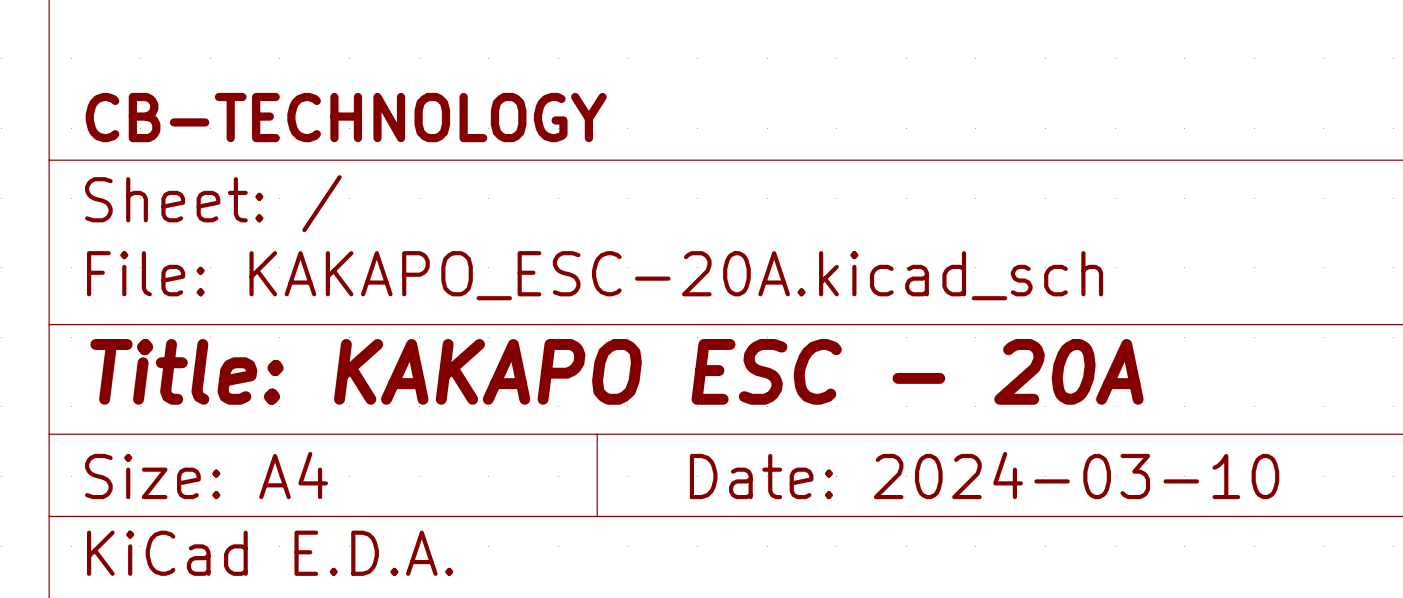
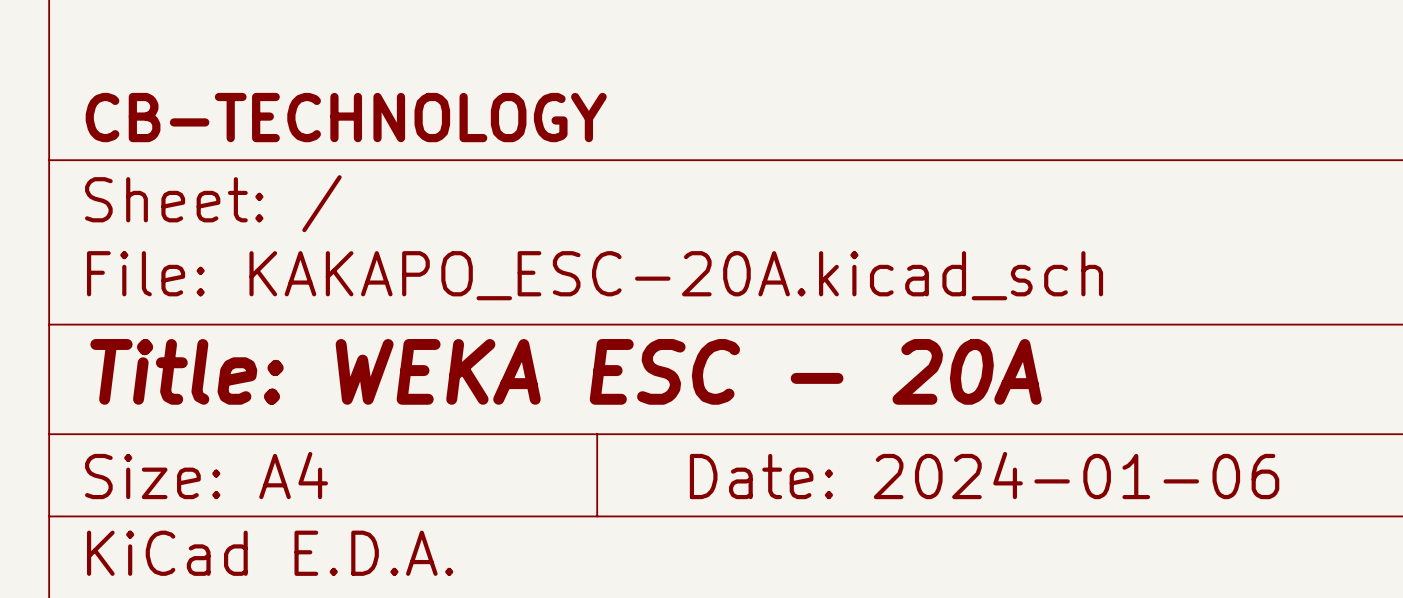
title block: Title: KAKAPO ESC - 20A (616, 371) -> Title: WEKA ESC - 20A (566, 371)
title block: Date: 2024-03-10 (984, 475) -> Date: 2024-01-06 (984, 475)

